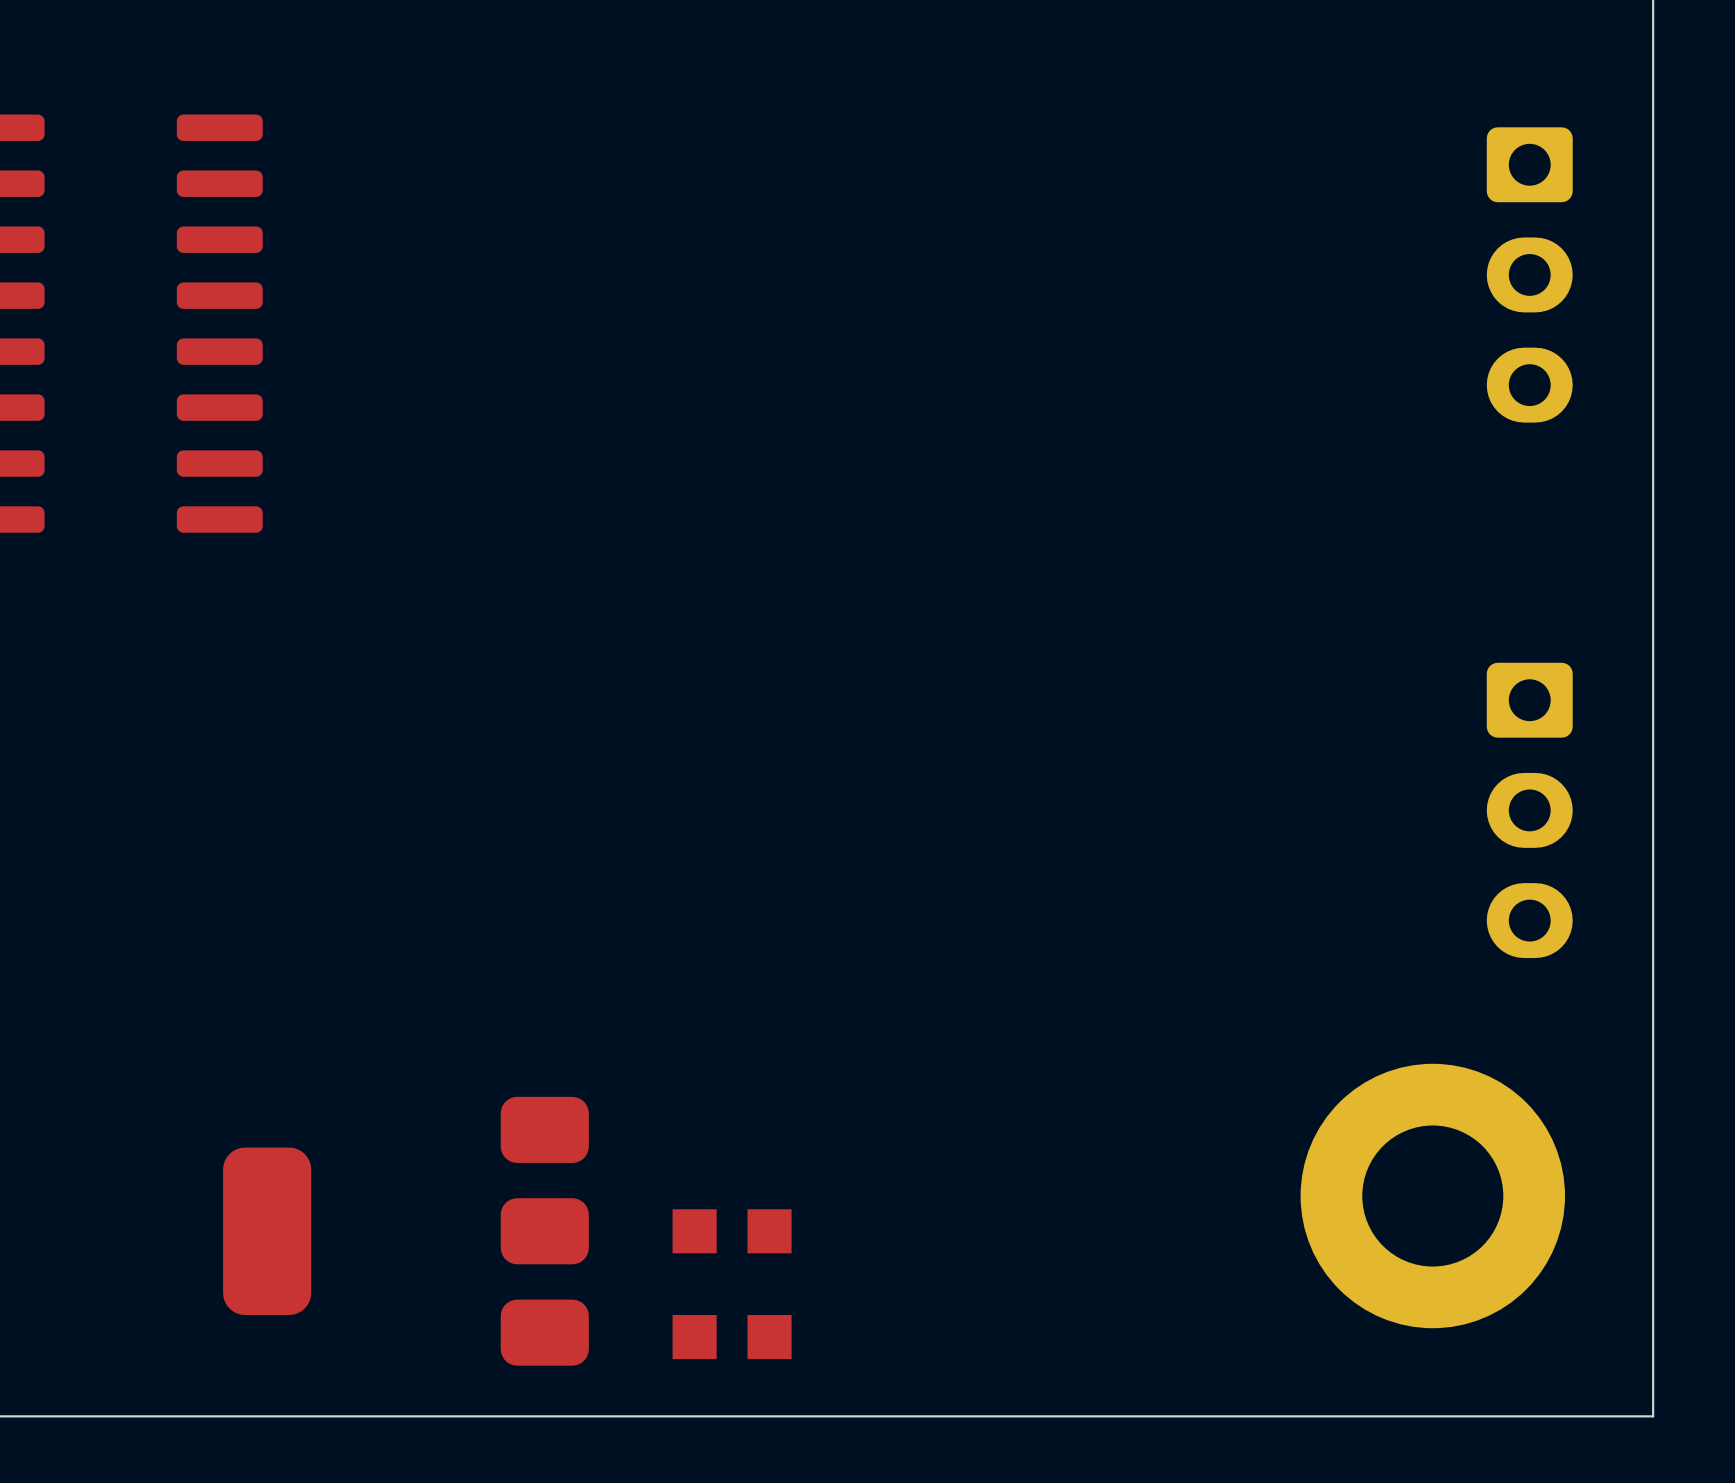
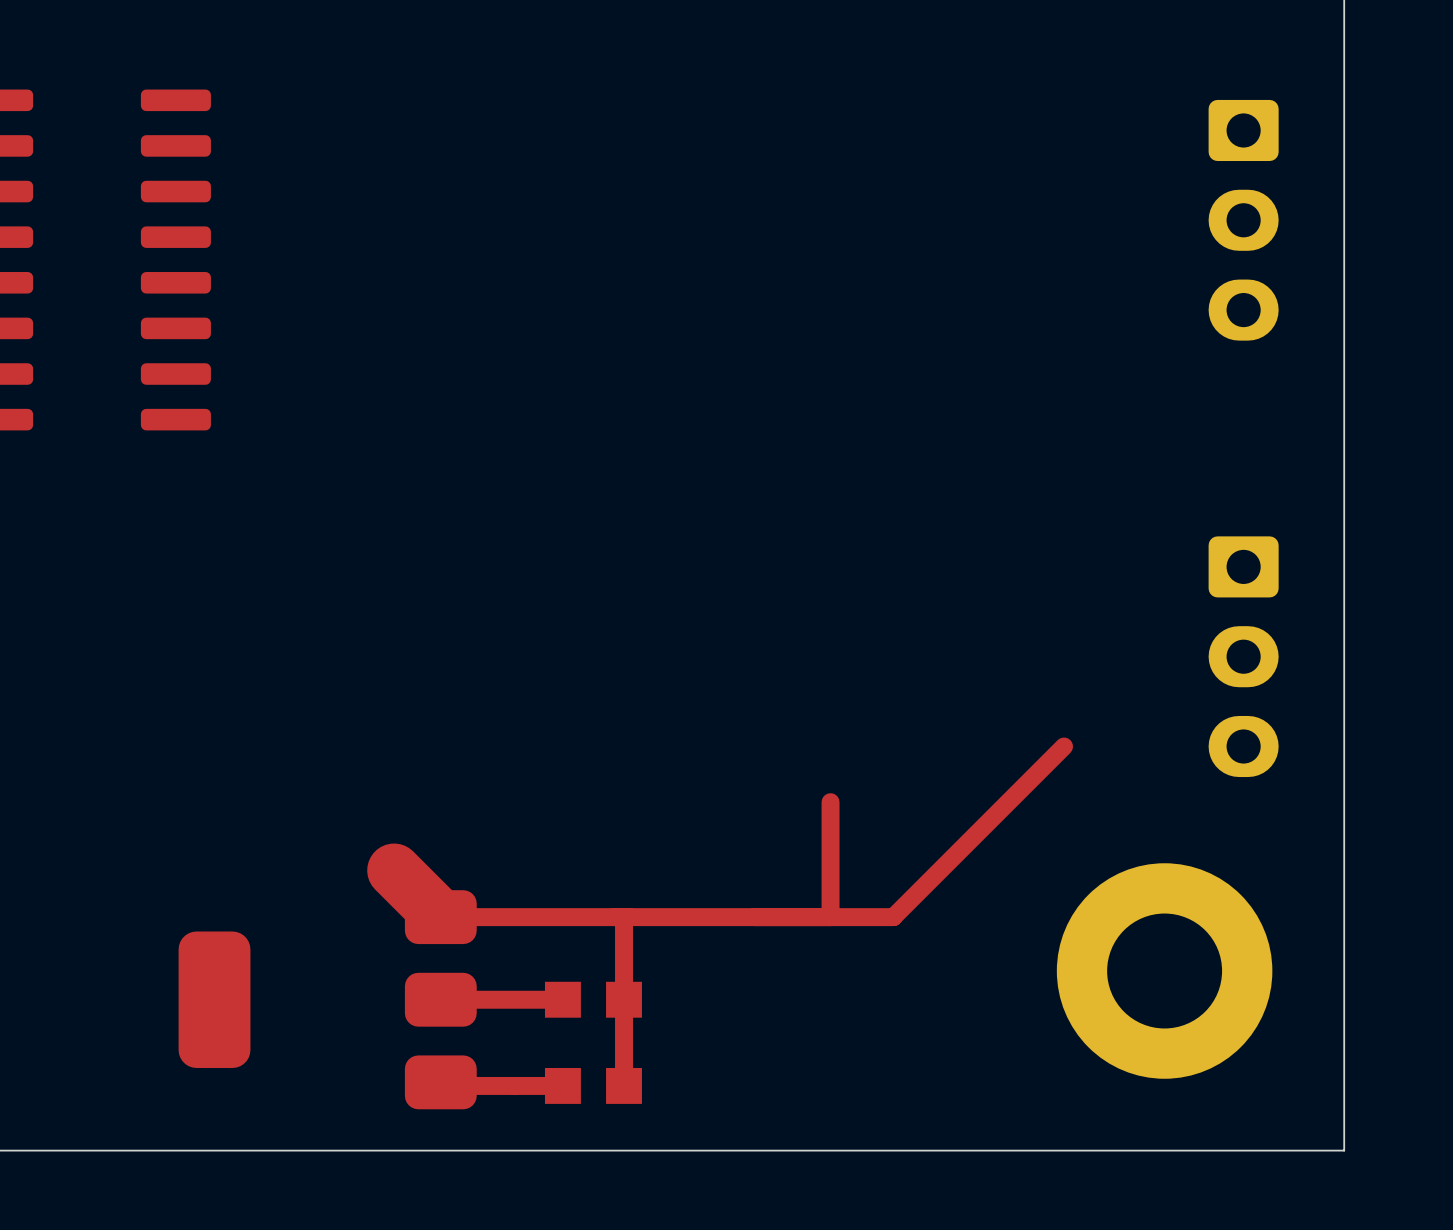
top track: none -> (1064, 746) (893, 917) (440, 917) (394, 870)
top track: none -> (830, 802) (830, 917)
top track: none -> (624, 926) (624, 1085)
top track: none -> (562, 999) (440, 999)
top track: none -> (562, 1085) (444, 1085)

